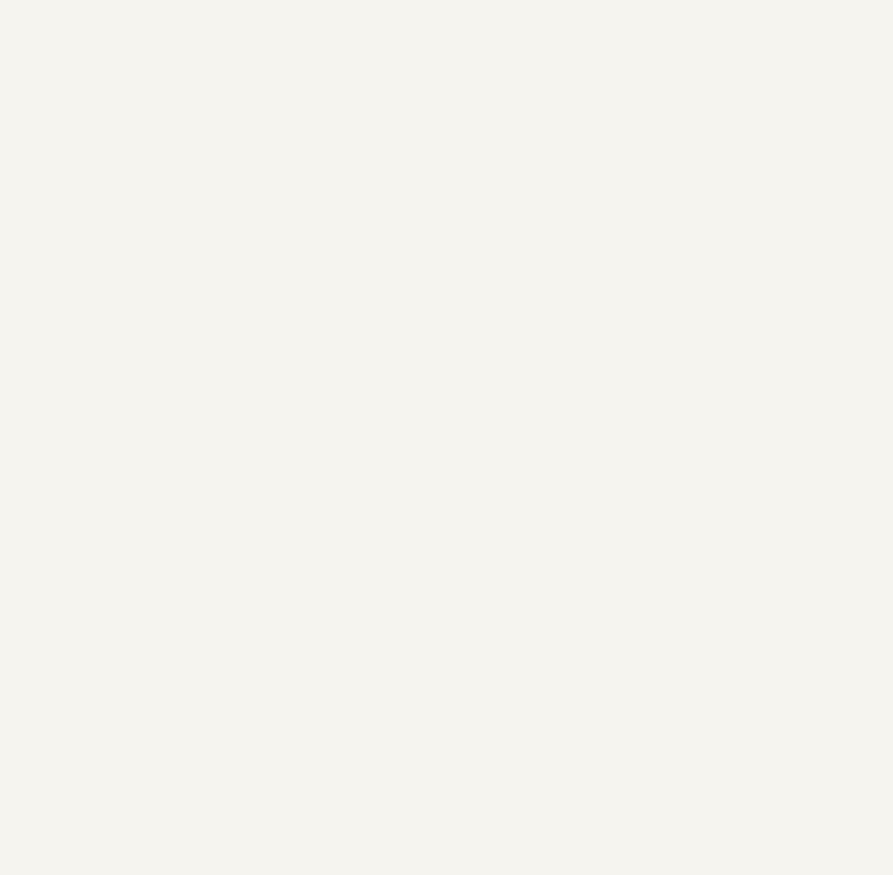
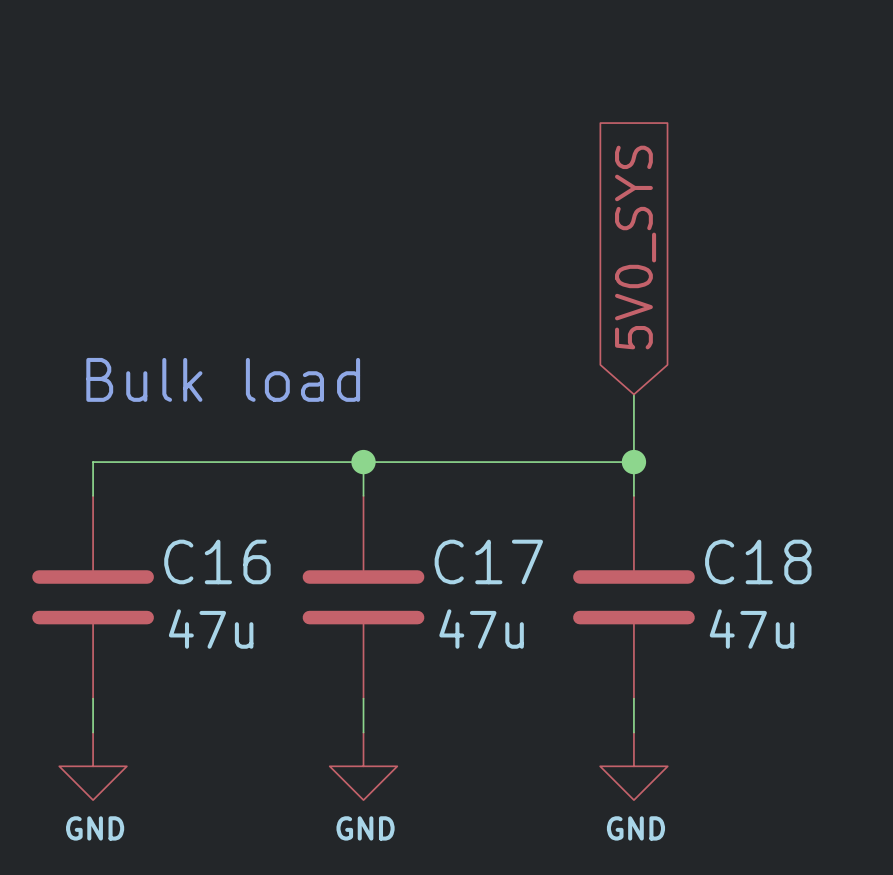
global label: none -> 5V0_SYS (635, 247)
text: none -> Bulk load (223, 379)
wire: none -> (633, 394) (633, 495)
wire: none -> (363, 462) (363, 495)
junction: none -> (363, 462)
wire: none -> (633, 462) (93, 462) (93, 495)
junction: none -> (633, 462)
C16: none -> (93, 597)
C17: none -> (363, 597)
C18: none -> (633, 597)
wire: none -> (93, 698) (93, 732)
wire: none -> (363, 698) (363, 732)
wire: none -> (633, 698) (633, 732)
power symbol: none -> GND (93, 766)
power symbol: none -> GND (363, 766)
power symbol: none -> GND (633, 766)

